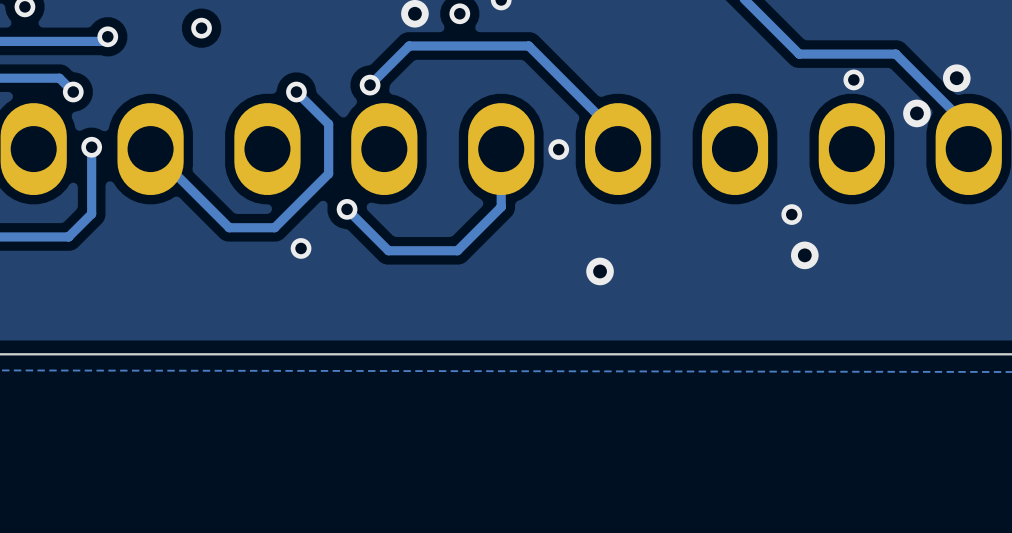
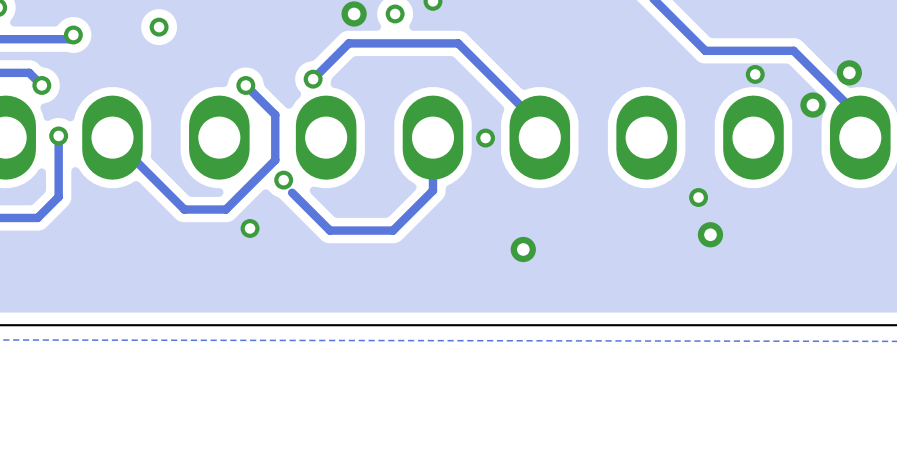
via position: (347, 209) -> (283, 180)

